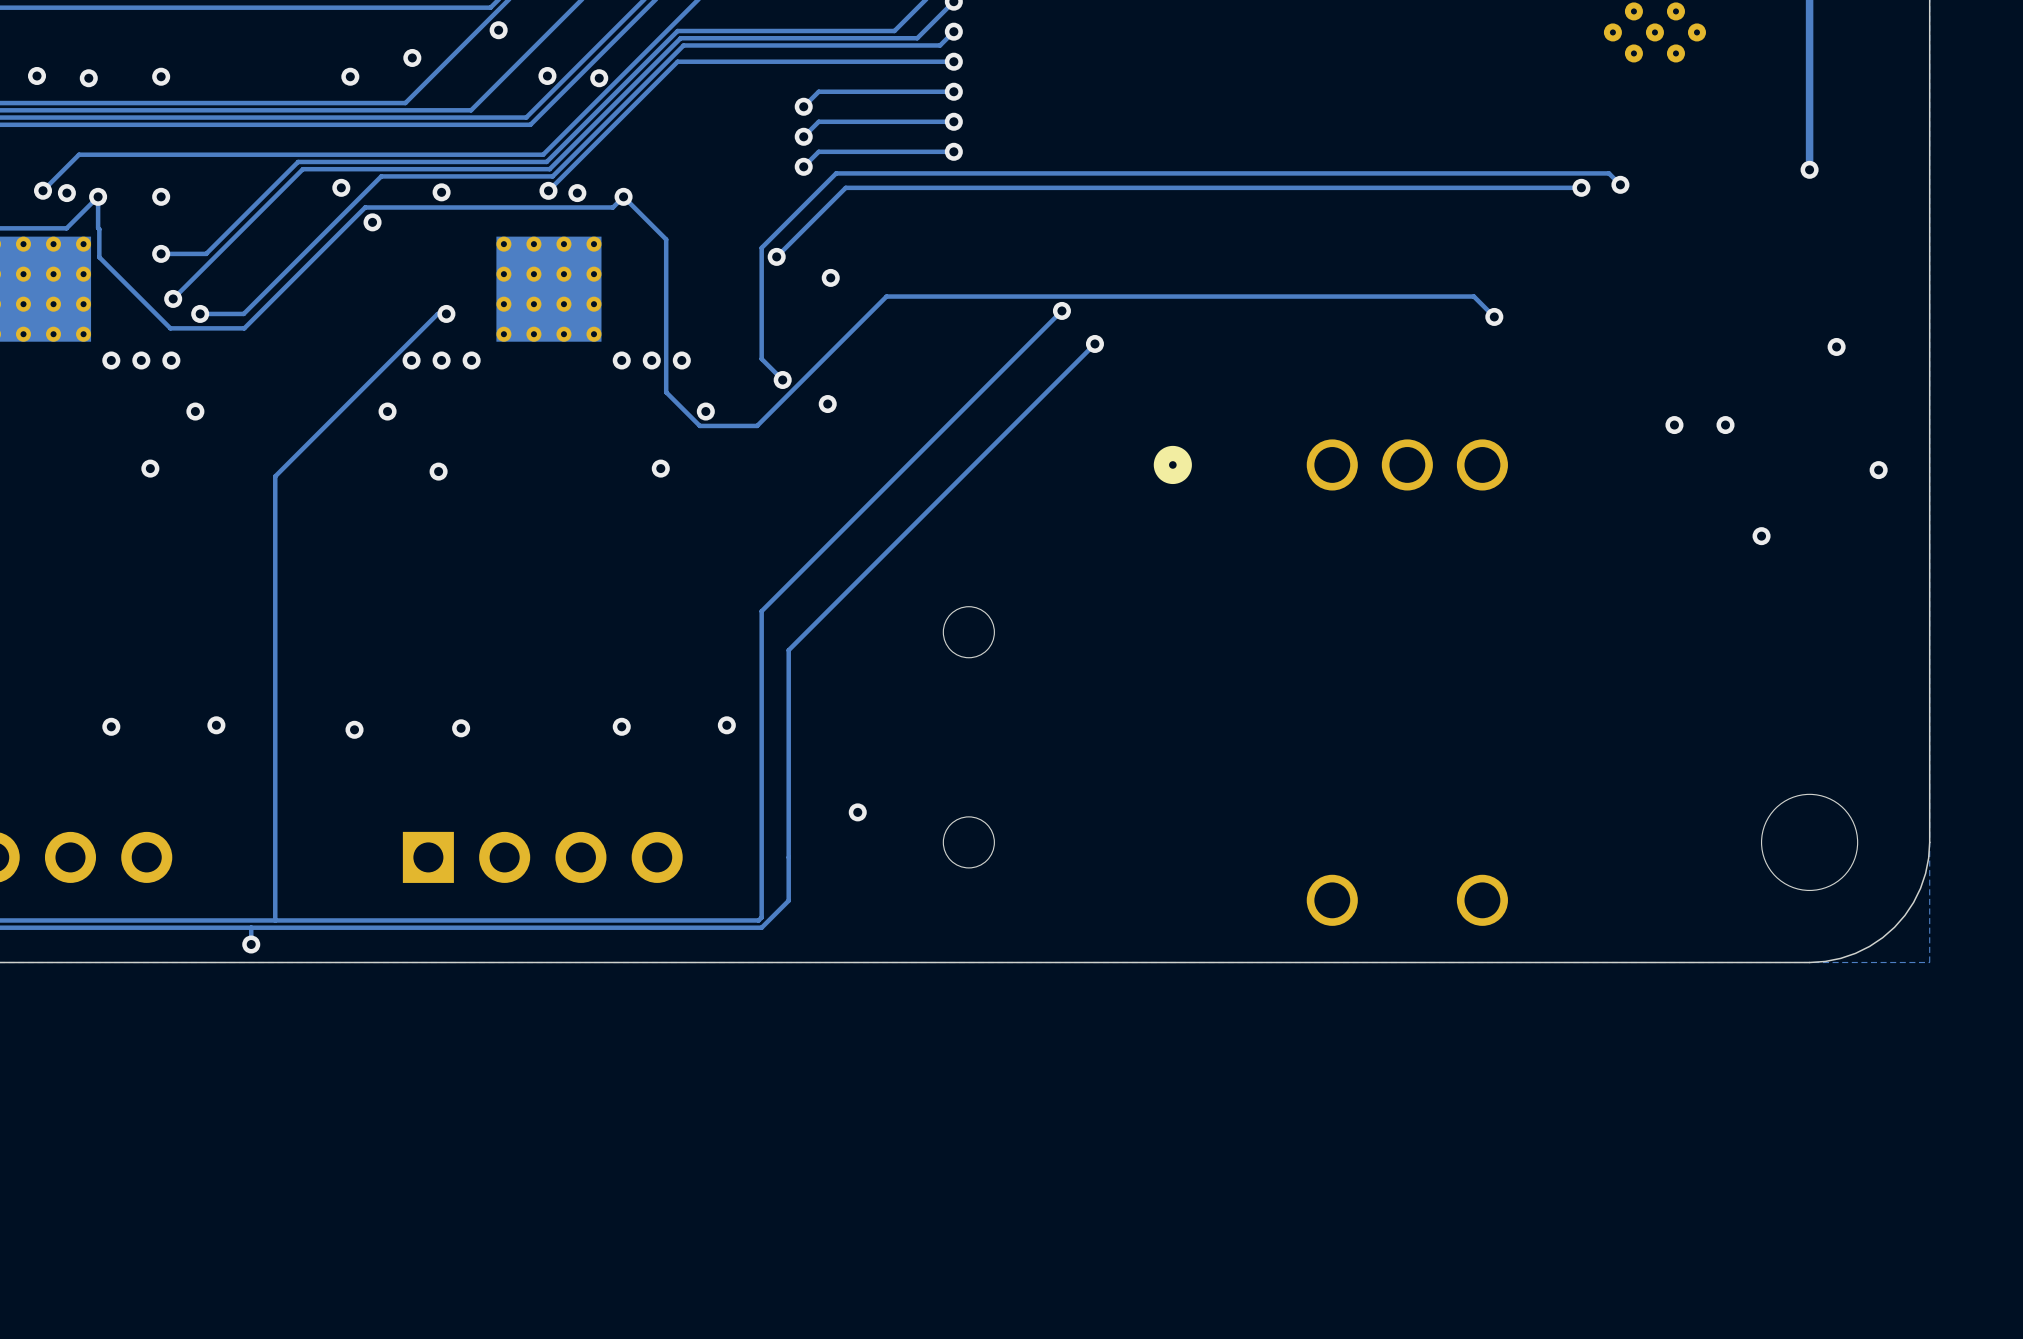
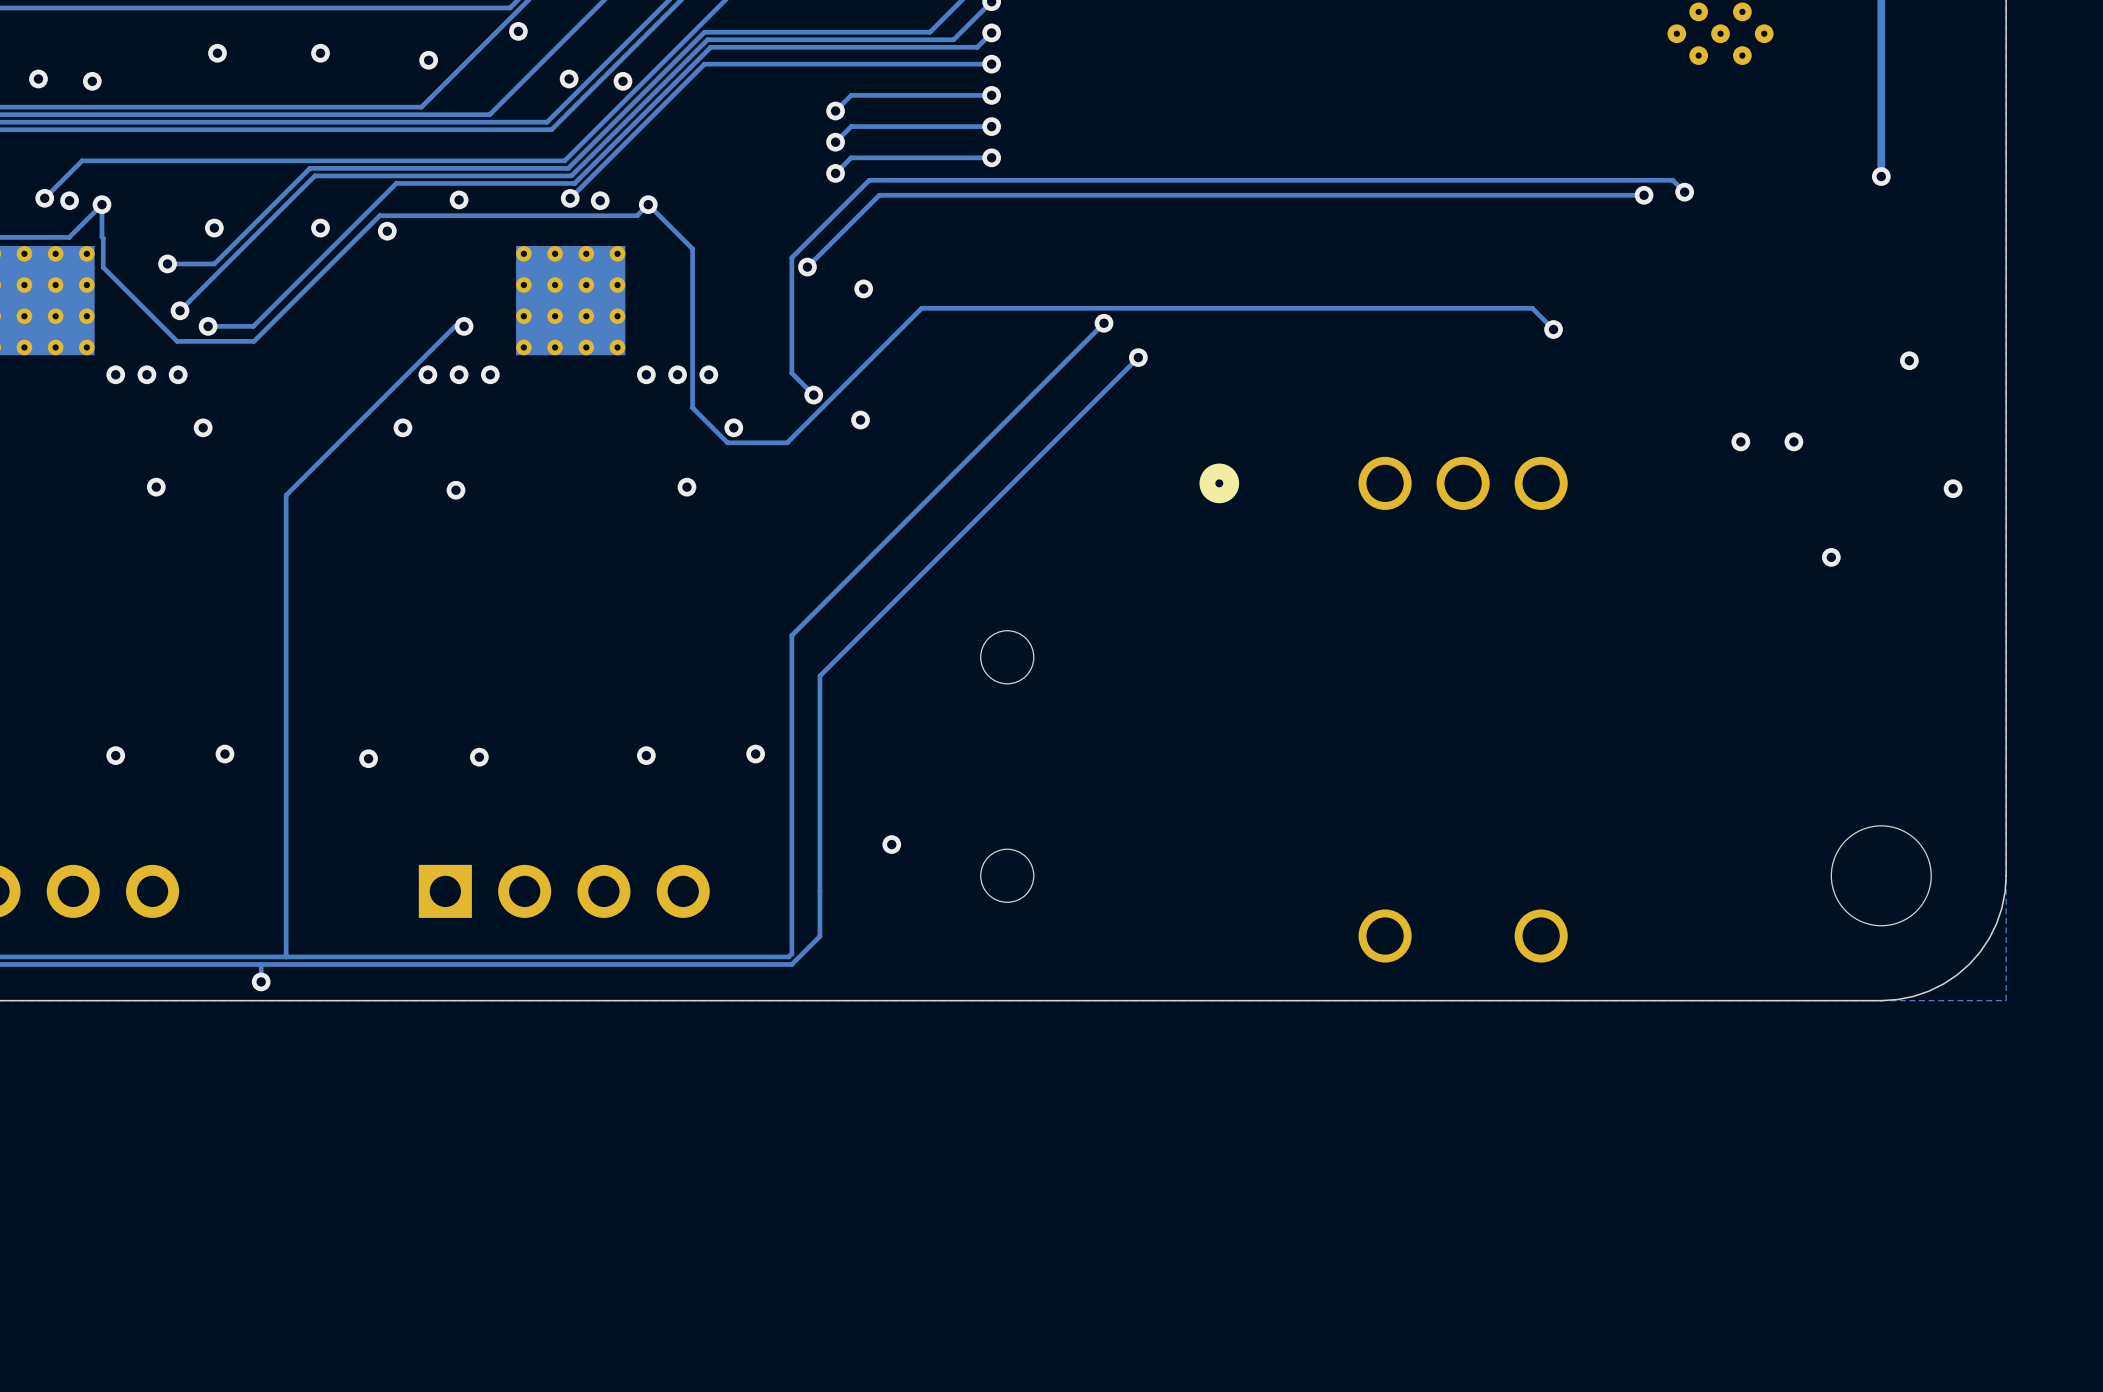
via position: (161, 76) -> (217, 53)
via position: (350, 76) -> (320, 53)
via position: (341, 187) -> (320, 228)
via position: (161, 196) -> (214, 228)

